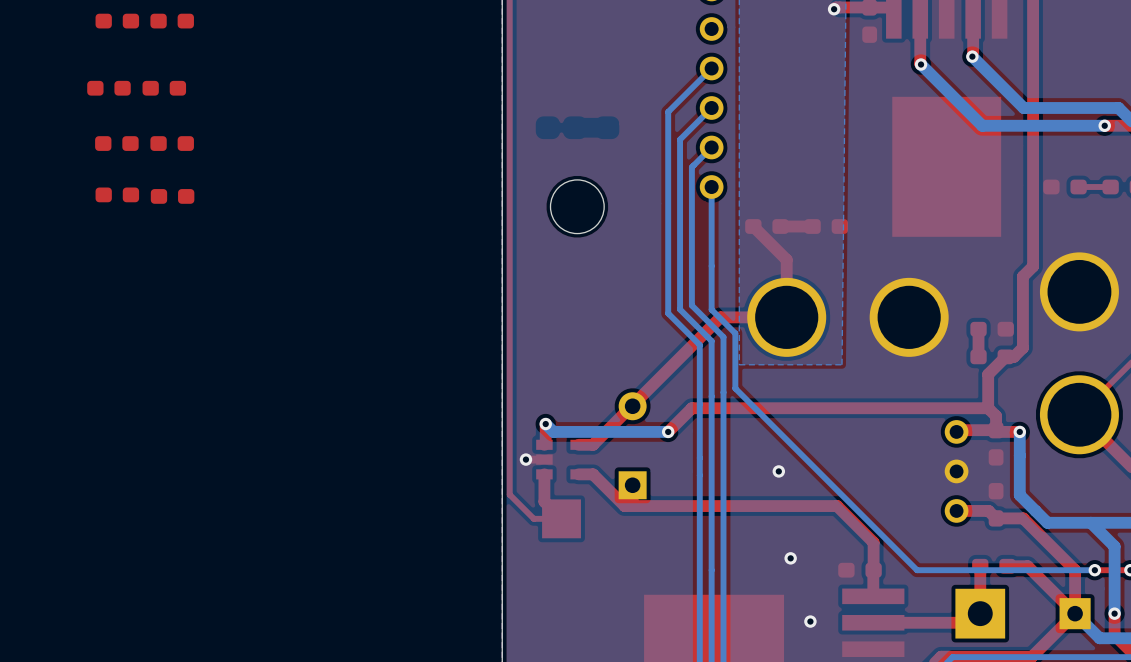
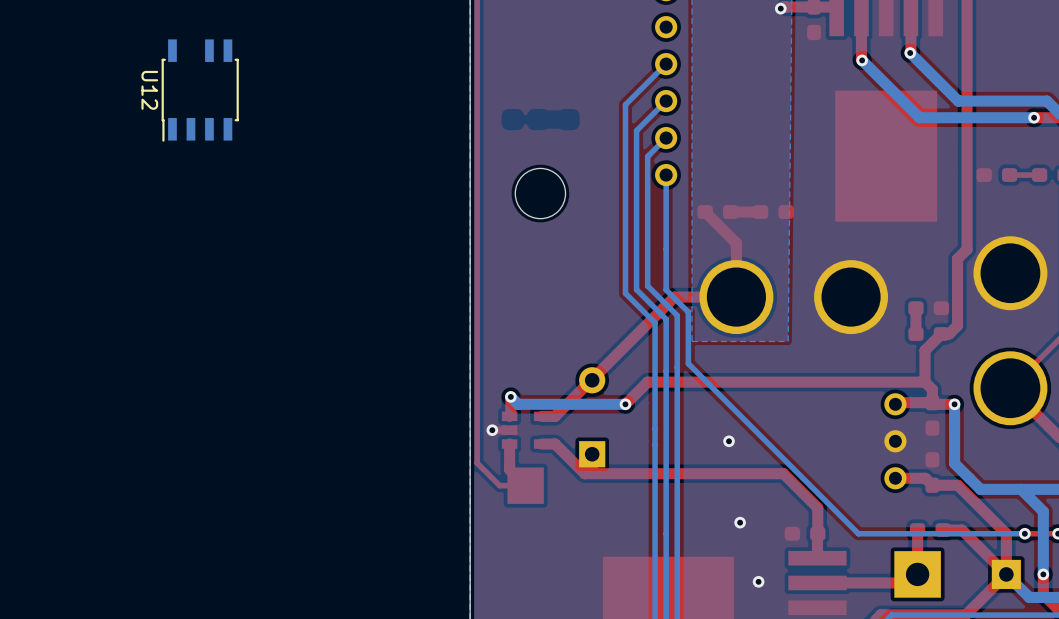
part: (117, 21) -> none
part: (172, 21) -> none
part: (108, 88) -> none
part: (164, 88) -> none
U12: none -> (200, 90)
part: (116, 143) -> none
part: (172, 143) -> none
part: (117, 194) -> none
part: (172, 196) -> none

